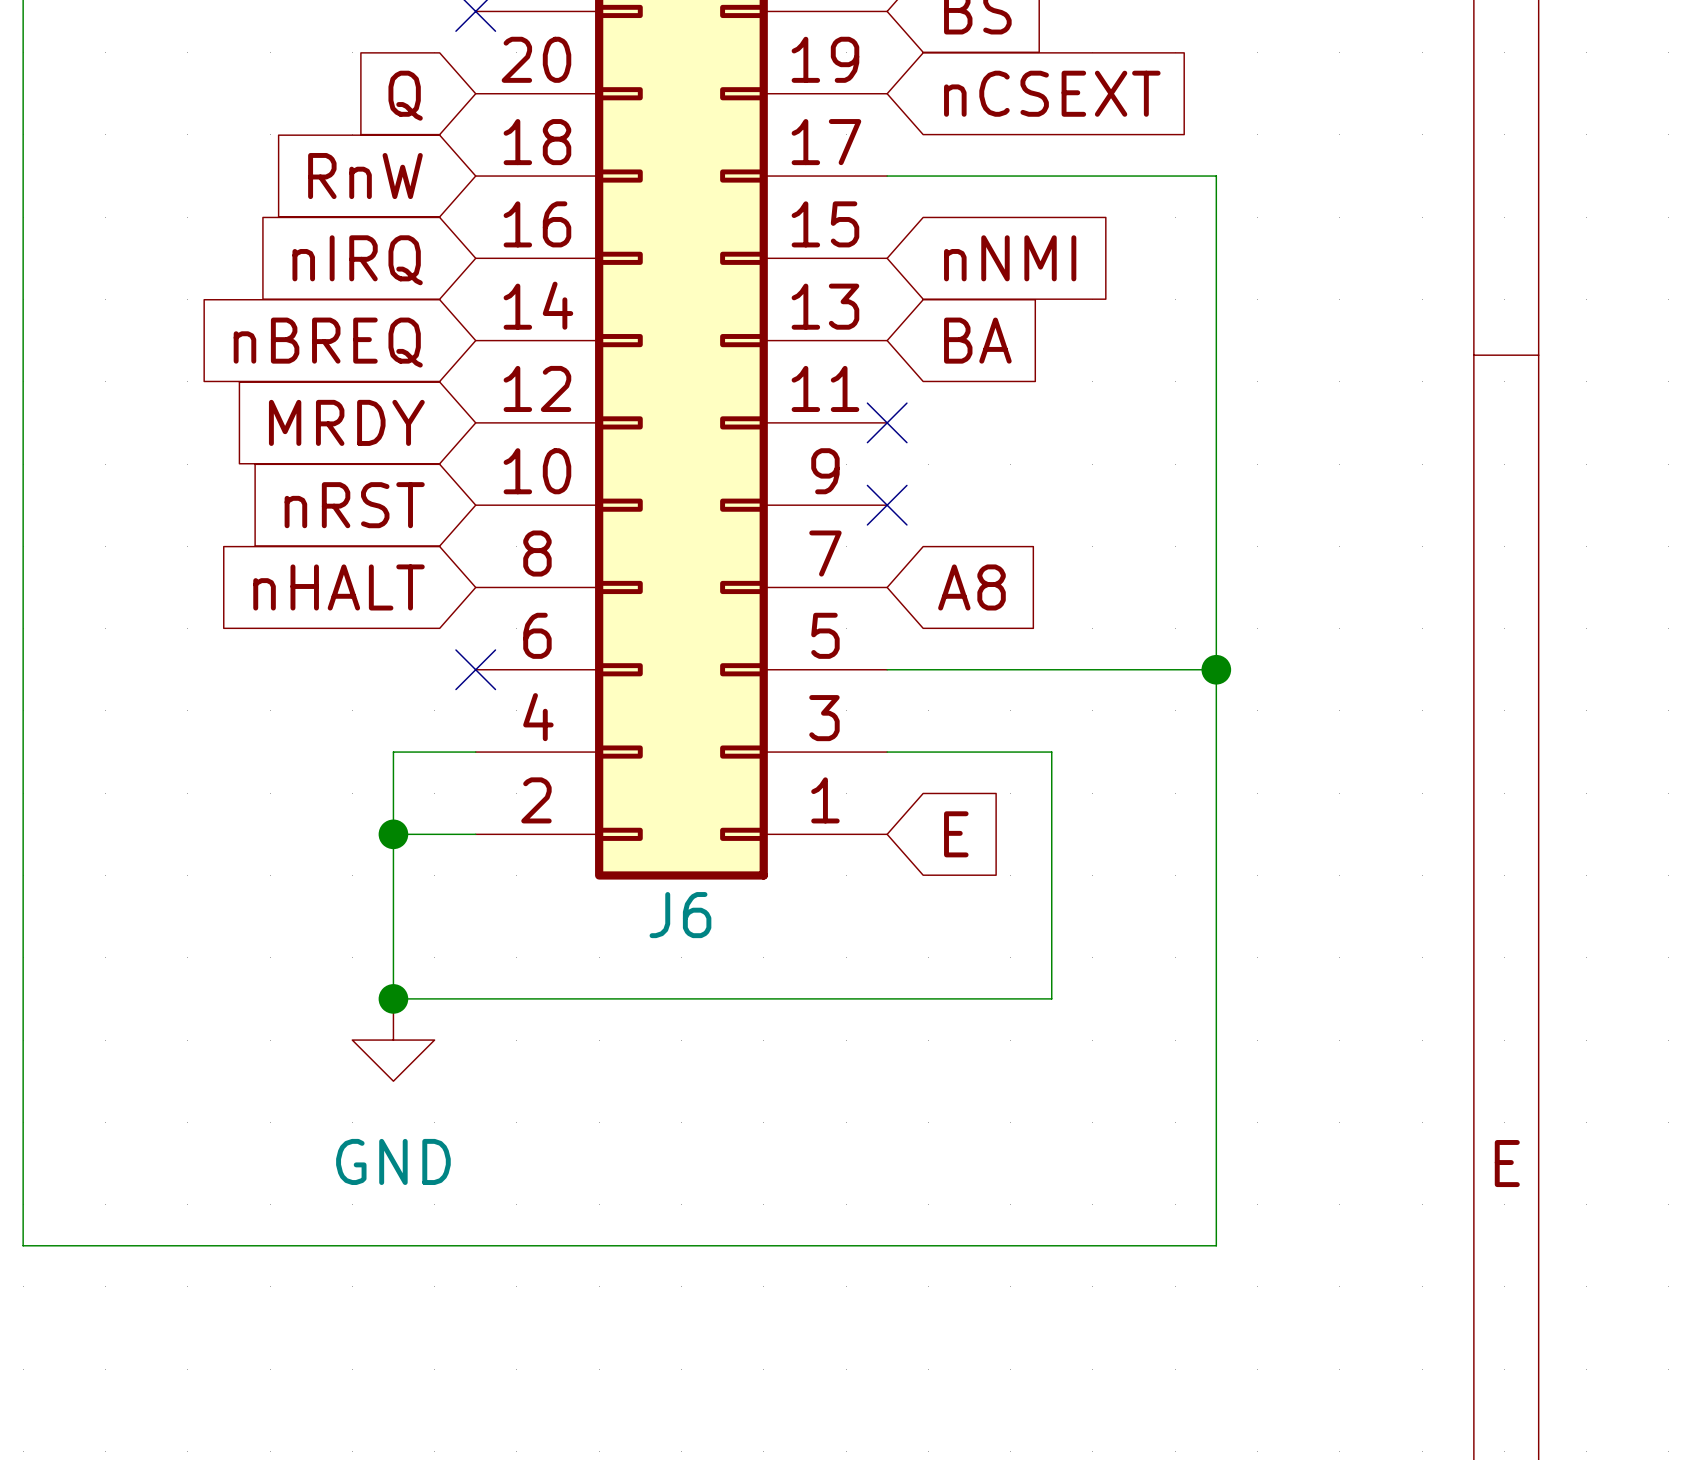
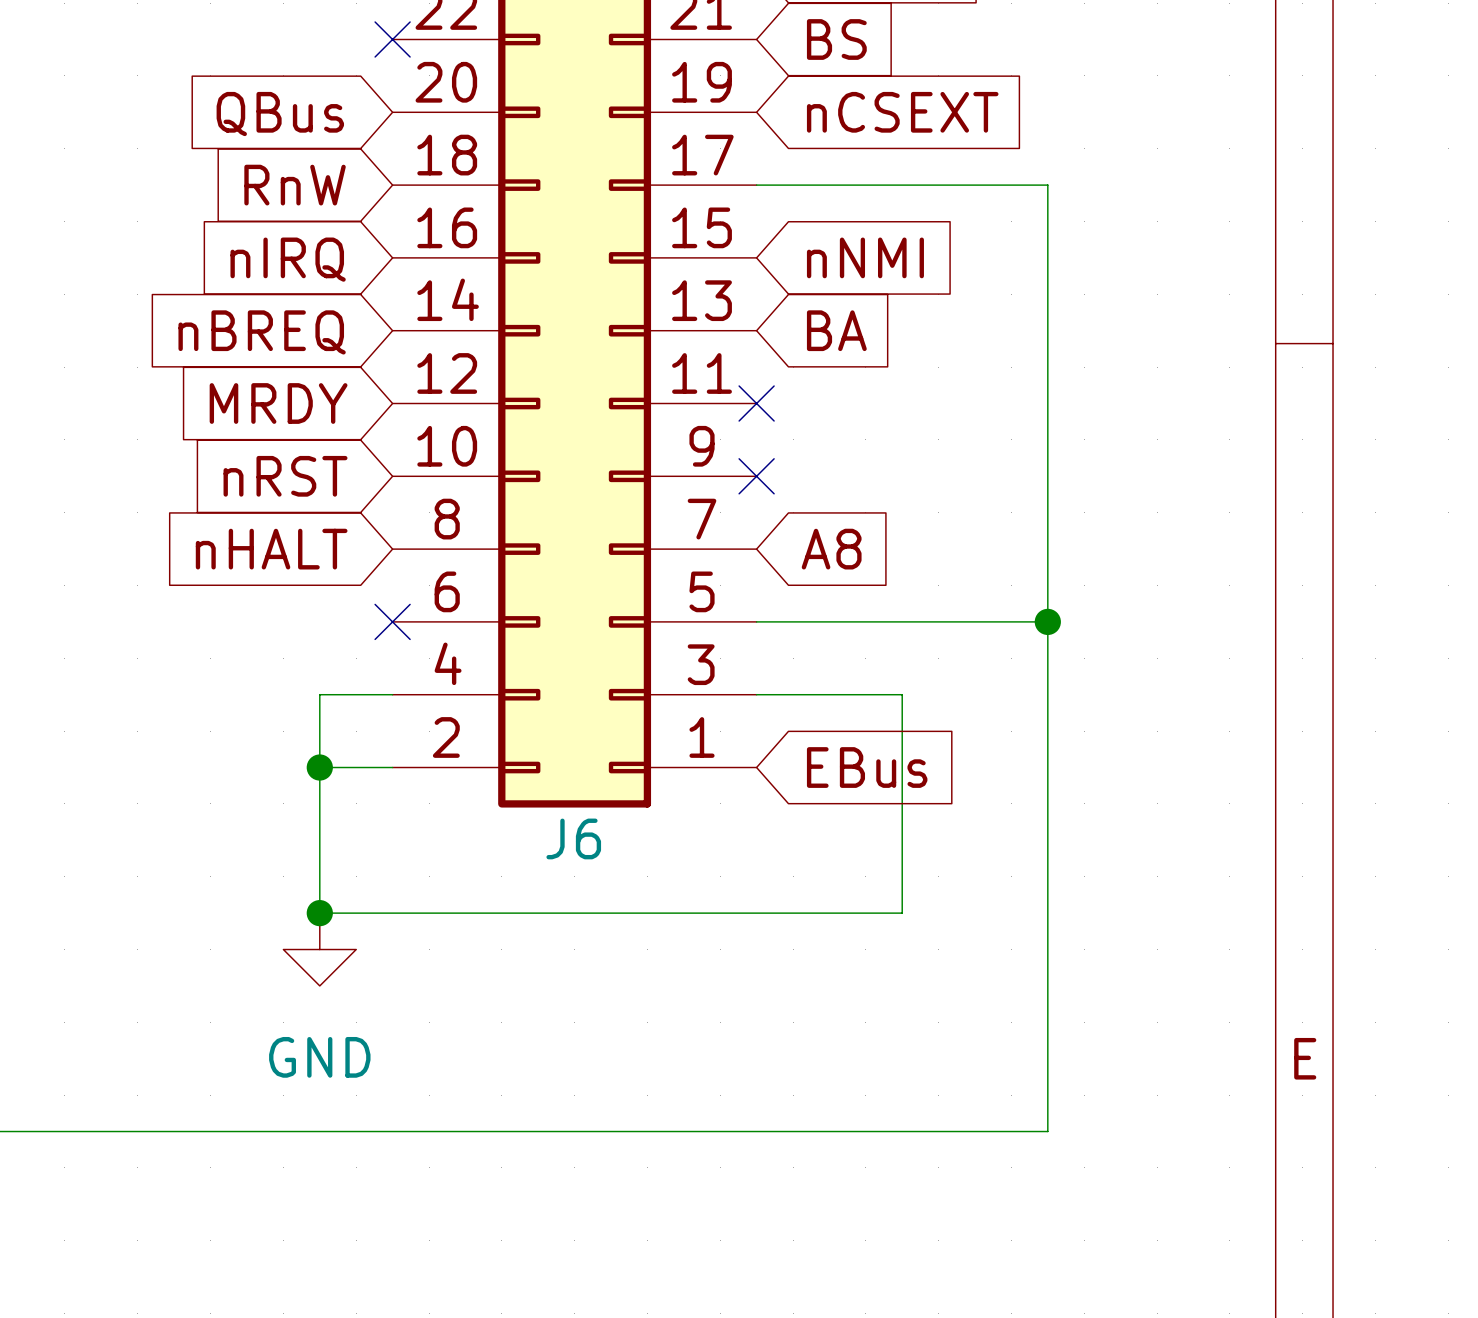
global label: Q (405, 95) -> QBus (280, 114)
global label: E (956, 834) -> EBus (867, 767)

